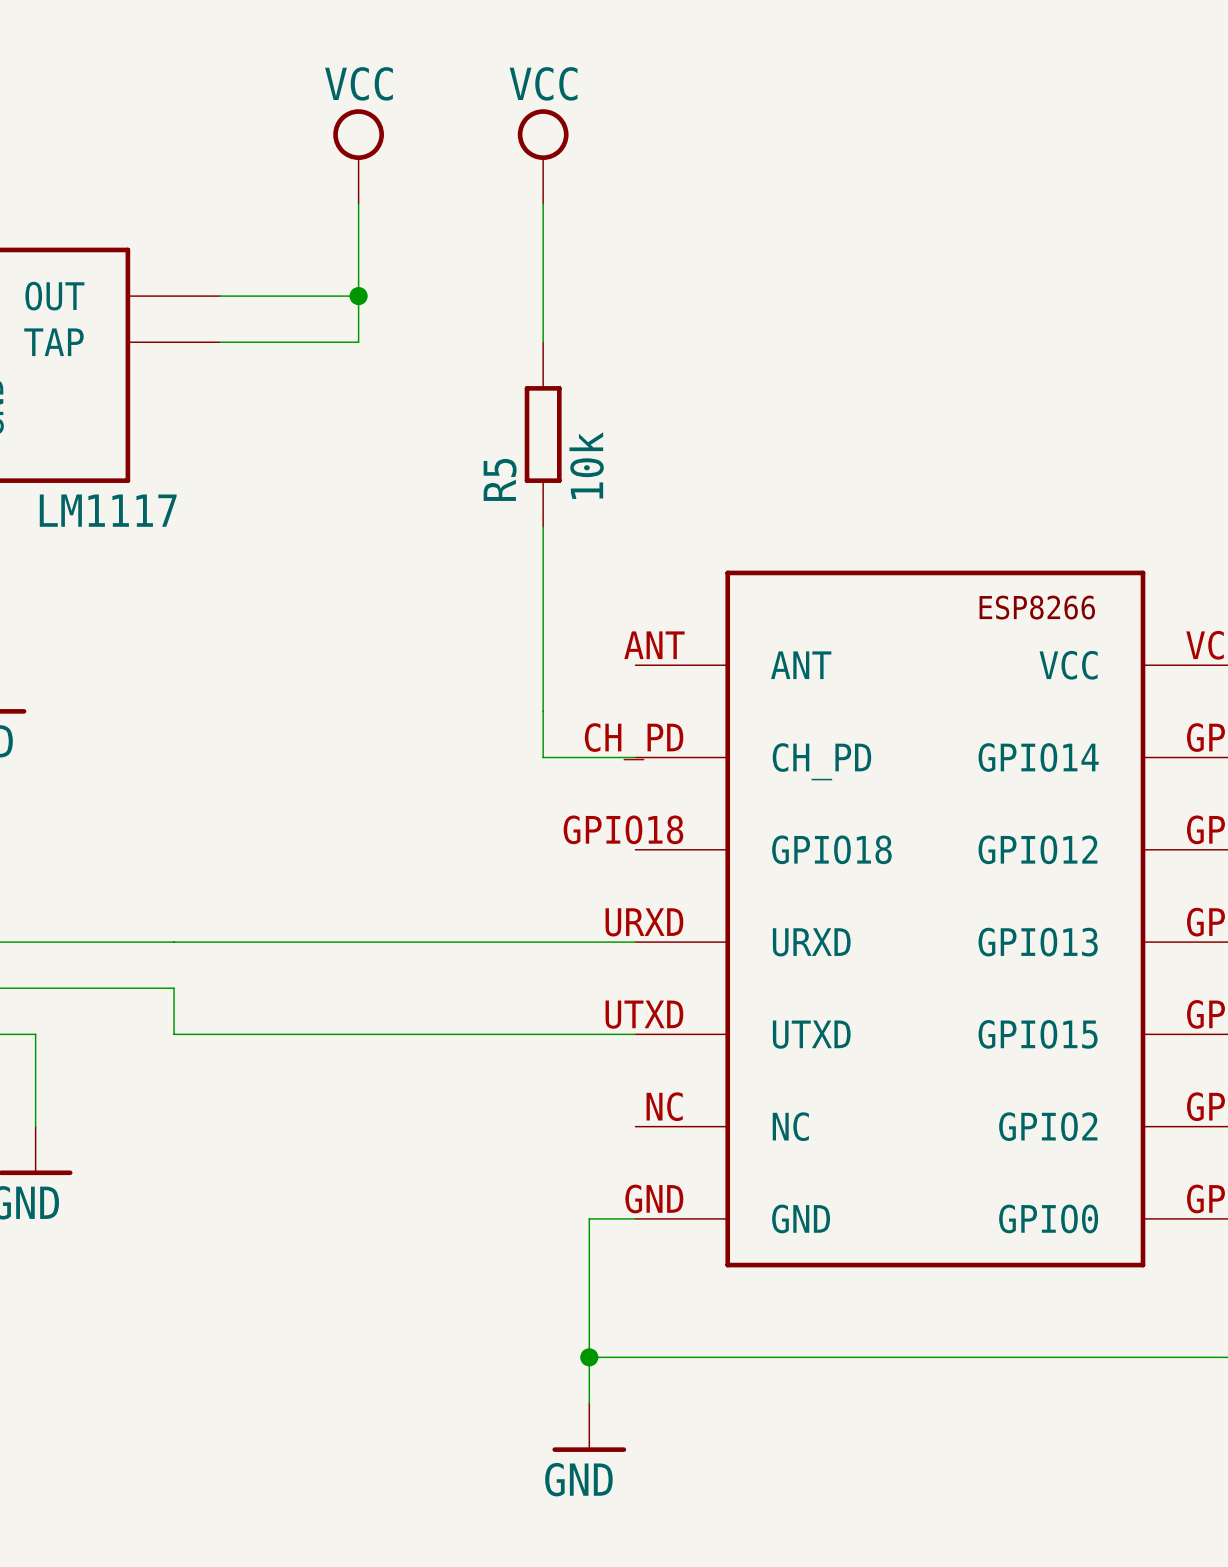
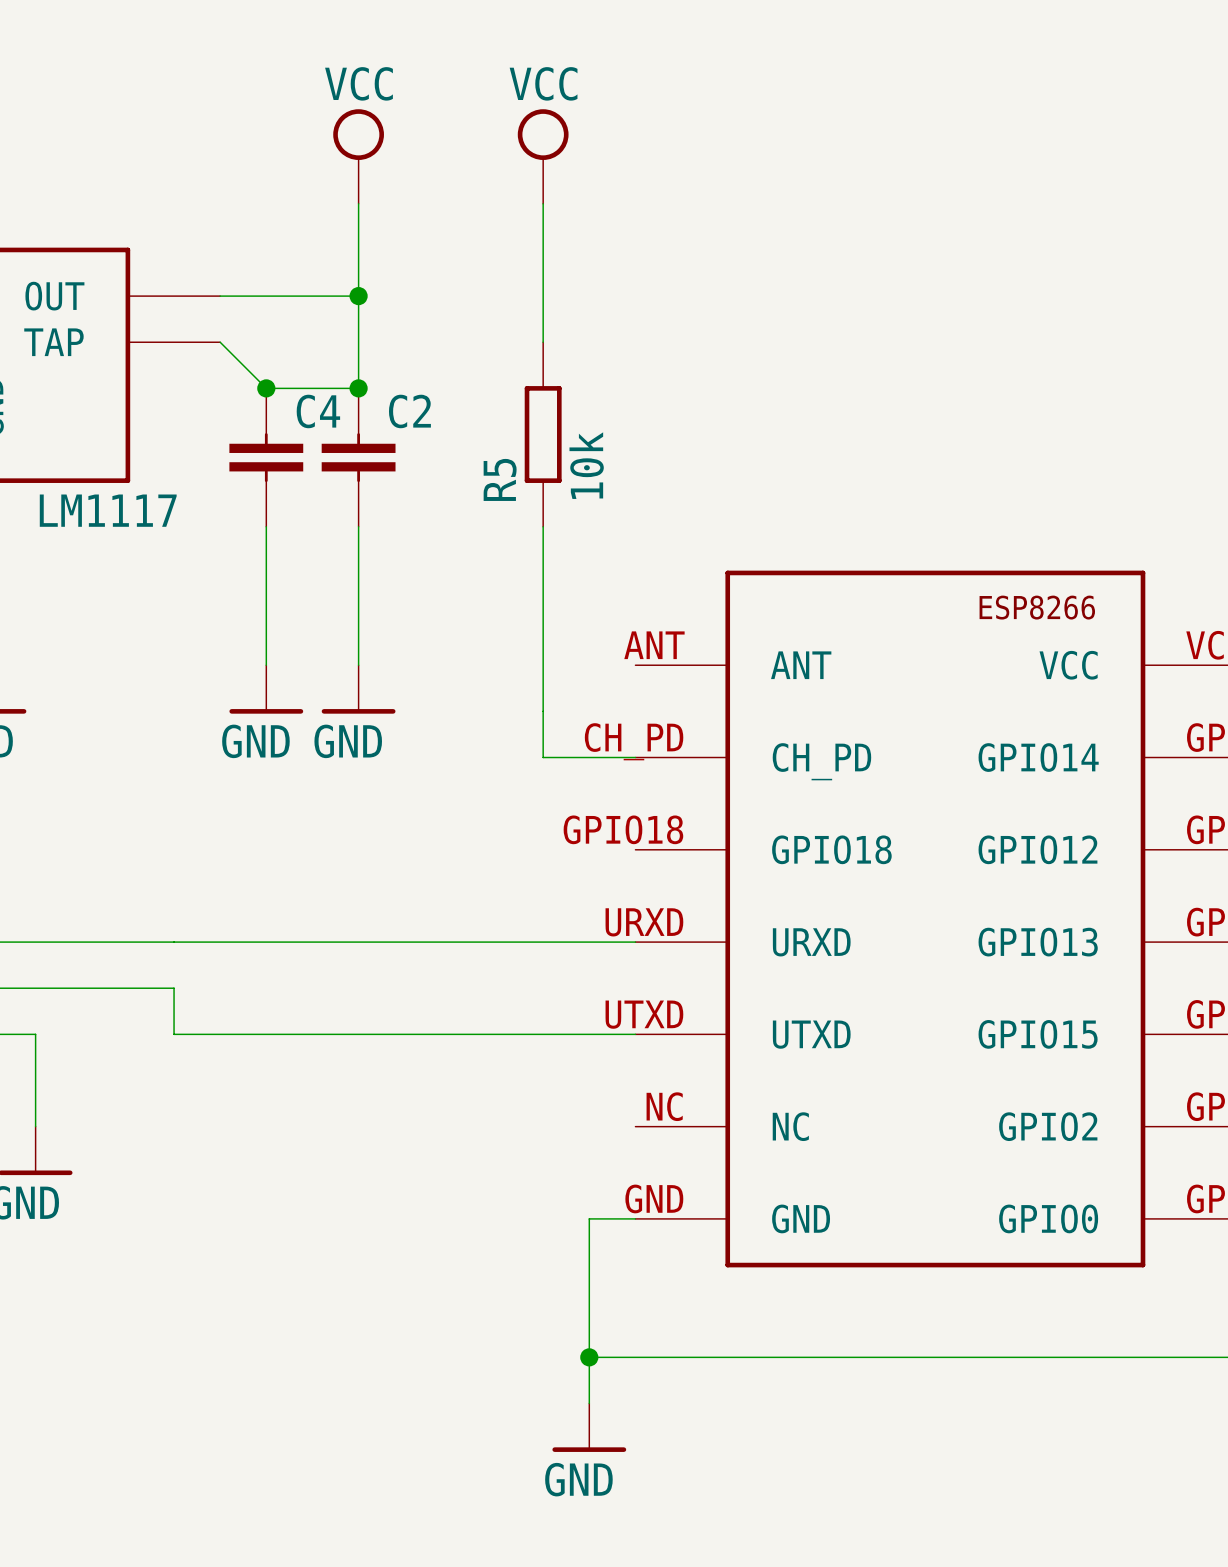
wire: (220, 342) (358, 342) -> (220, 342) (266, 388) (358, 388) (358, 342)
junction: none -> (266, 388)
junction: none -> (358, 388)
C4: none -> (266, 457)
C2: none -> (358, 457)
wire: none -> (266, 526) (266, 665)
wire: none -> (358, 526) (358, 665)
power symbol: none -> GND (266, 689)
power symbol: none -> GND (358, 689)

